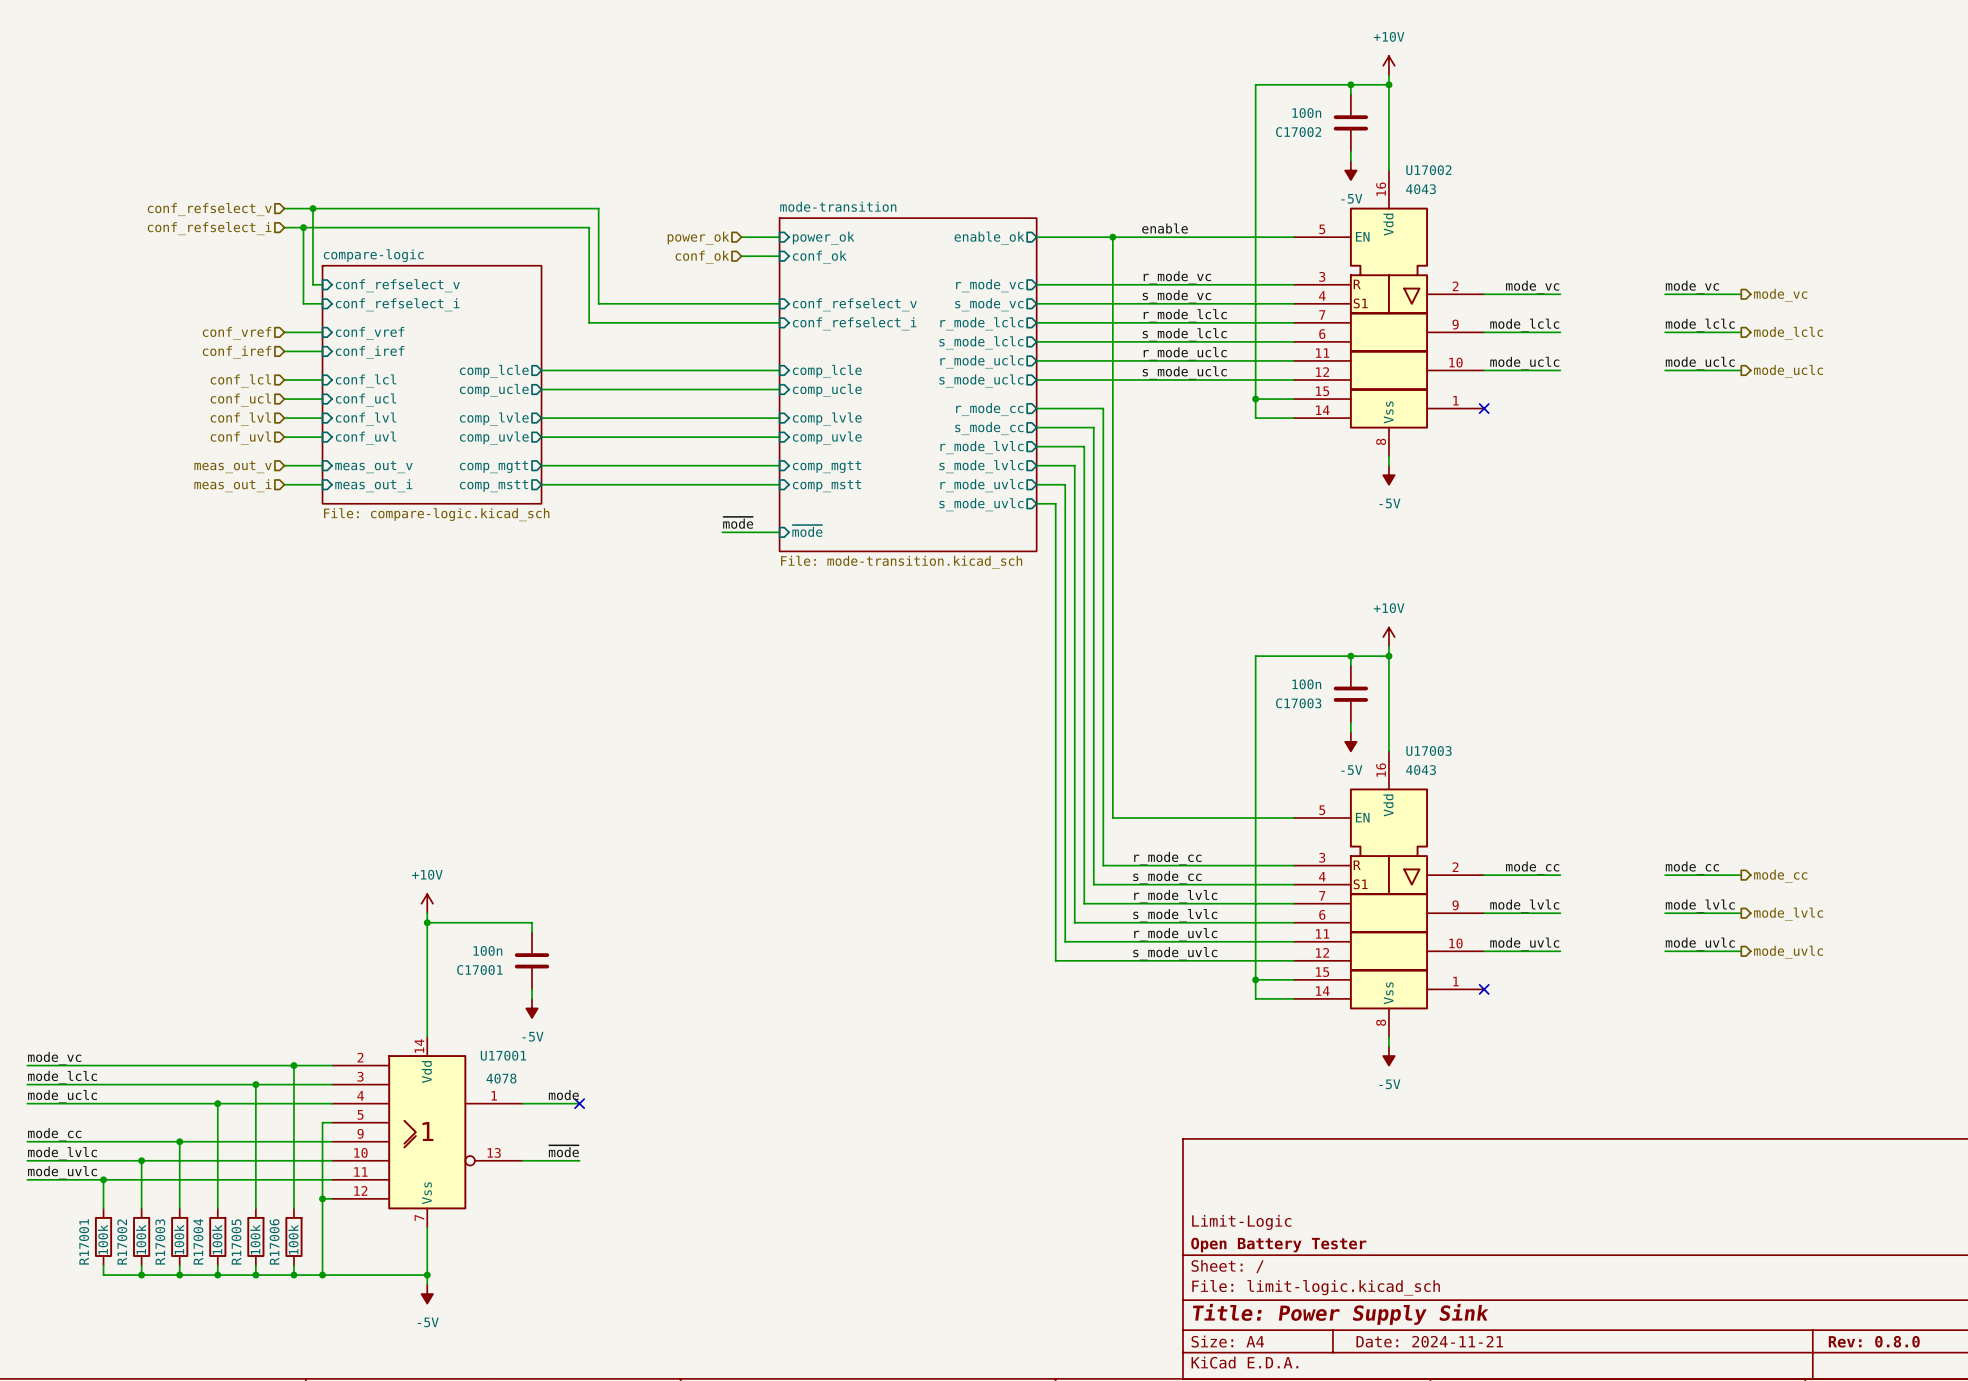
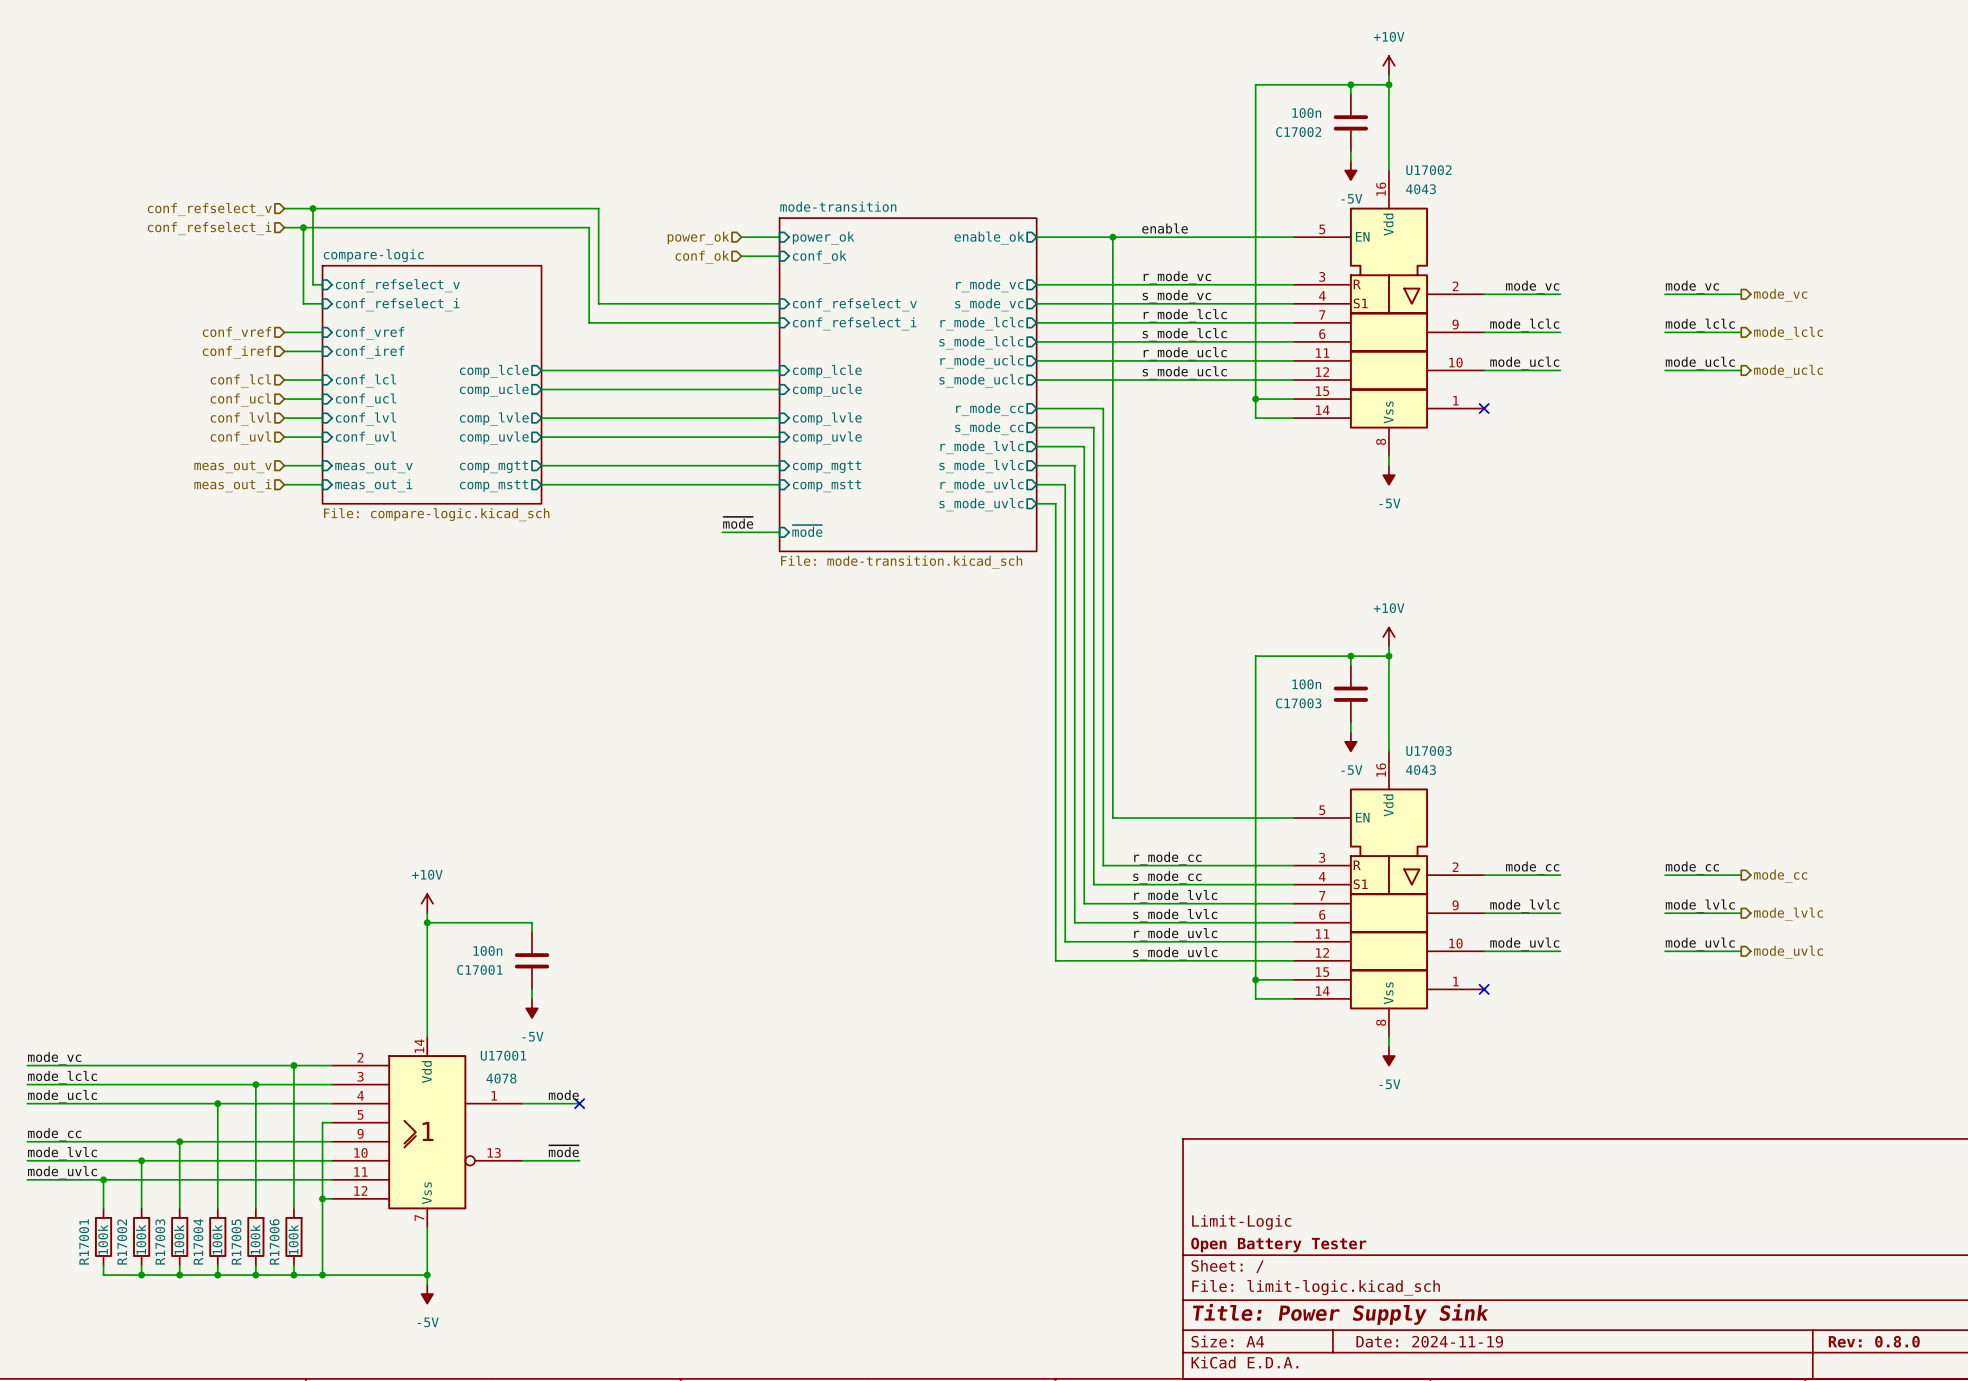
title block: Date: 2024-11-21 (1429, 1341) -> Date: 2024-11-19 (1429, 1341)

